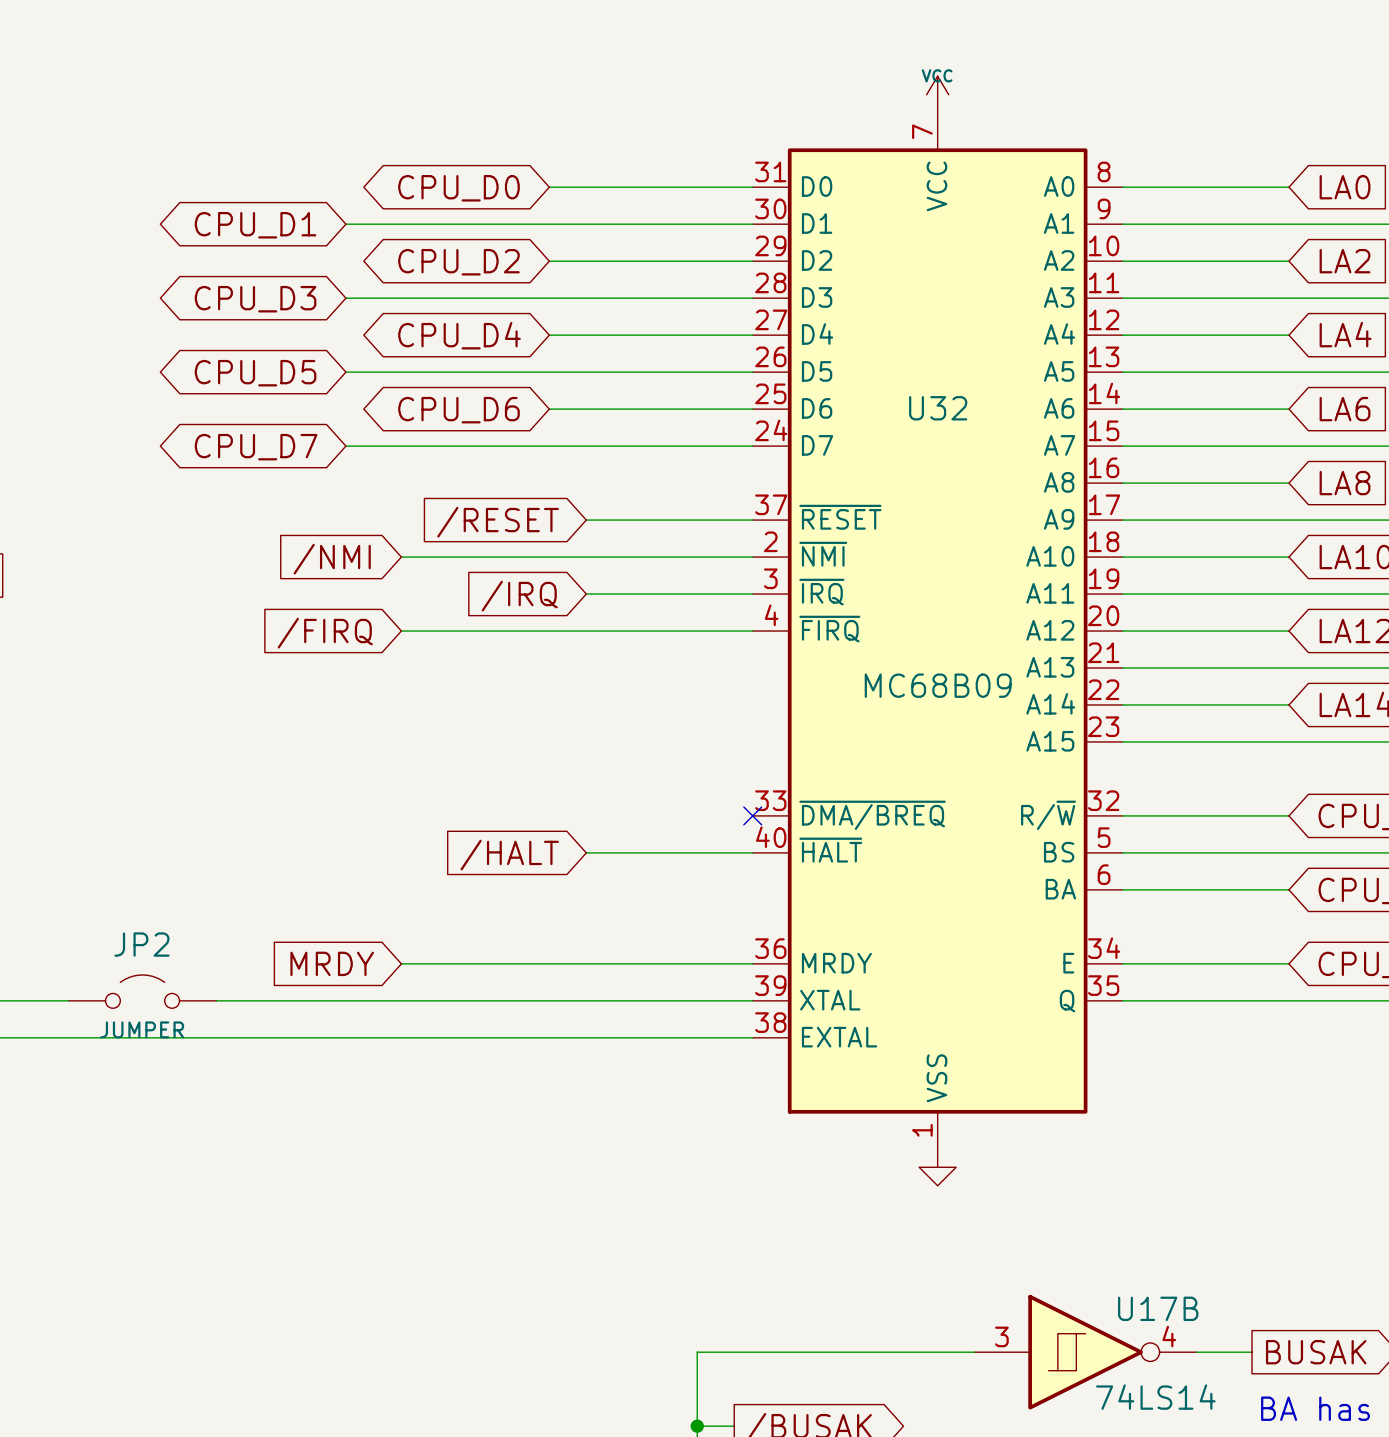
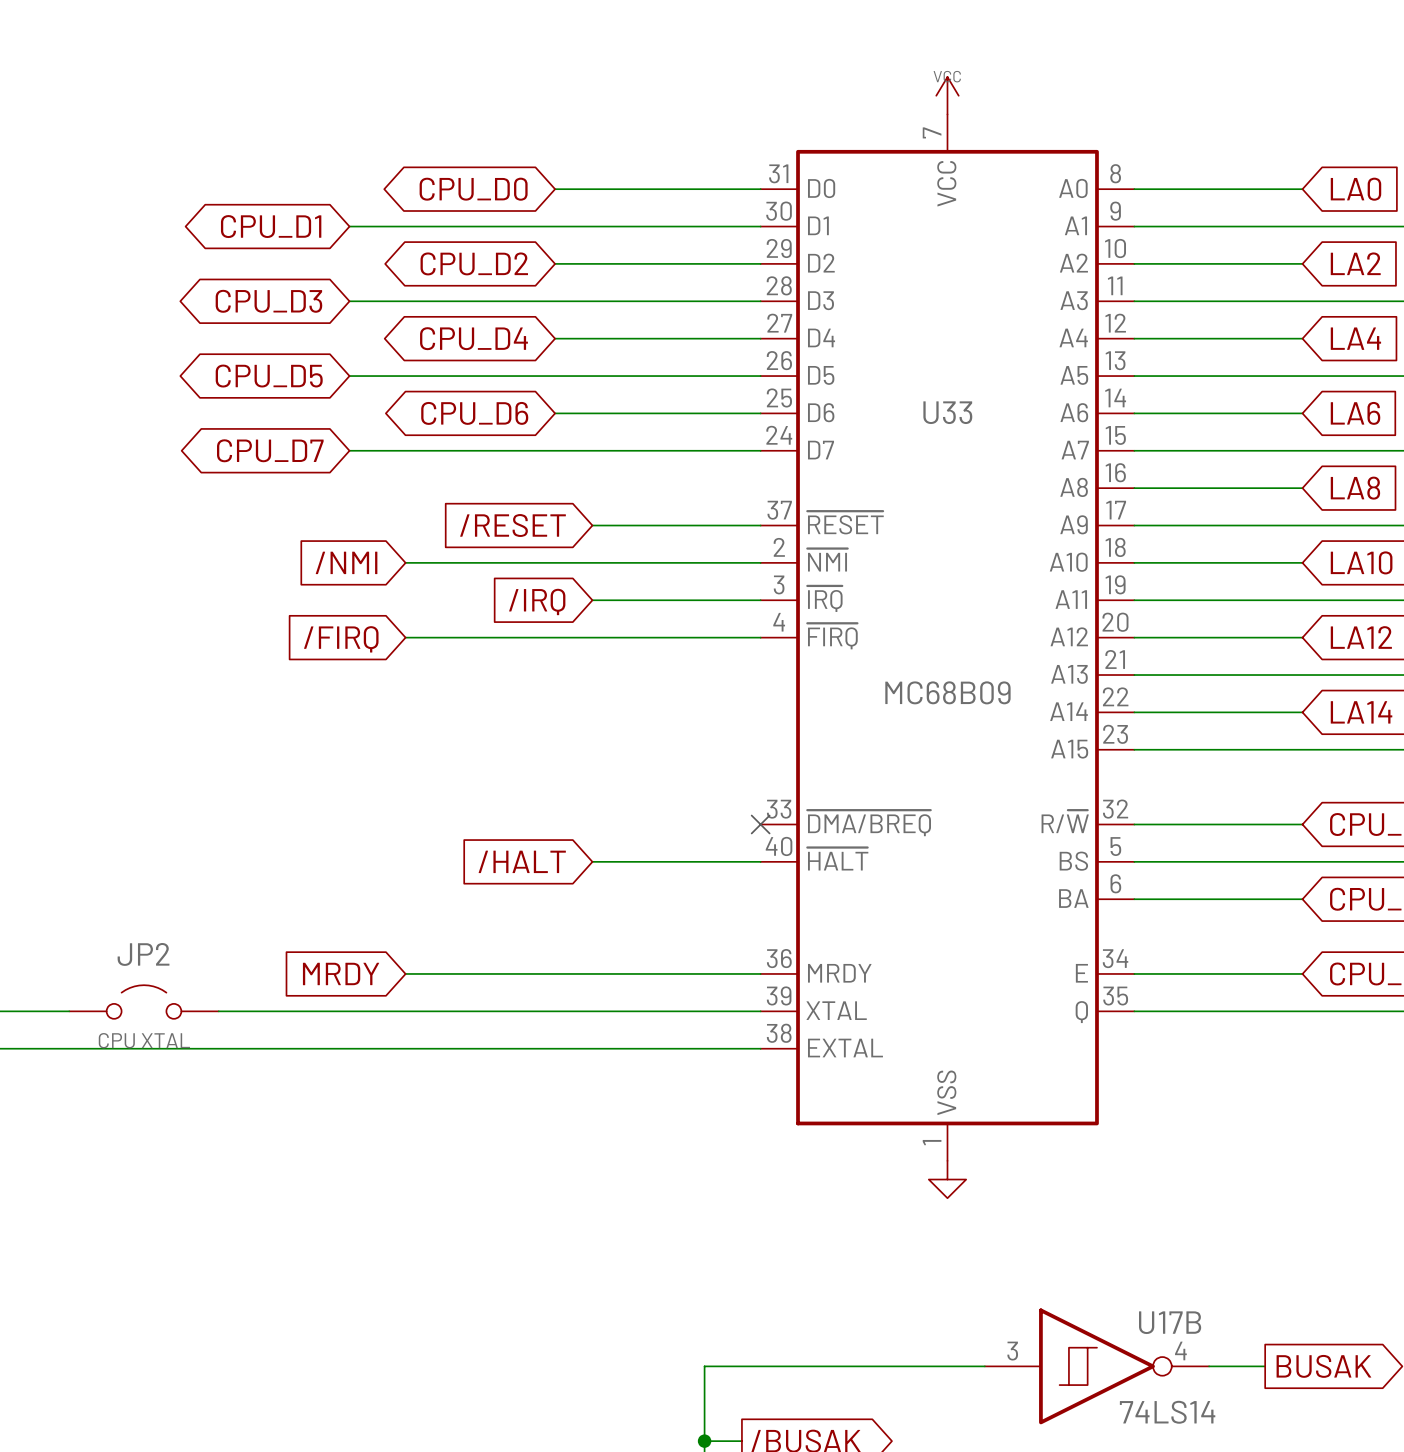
U32 name: U32 (938, 408) -> U33 (947, 412)
JP2 value: JUMPER (142, 1029) -> CPU XTAL (144, 1040)

